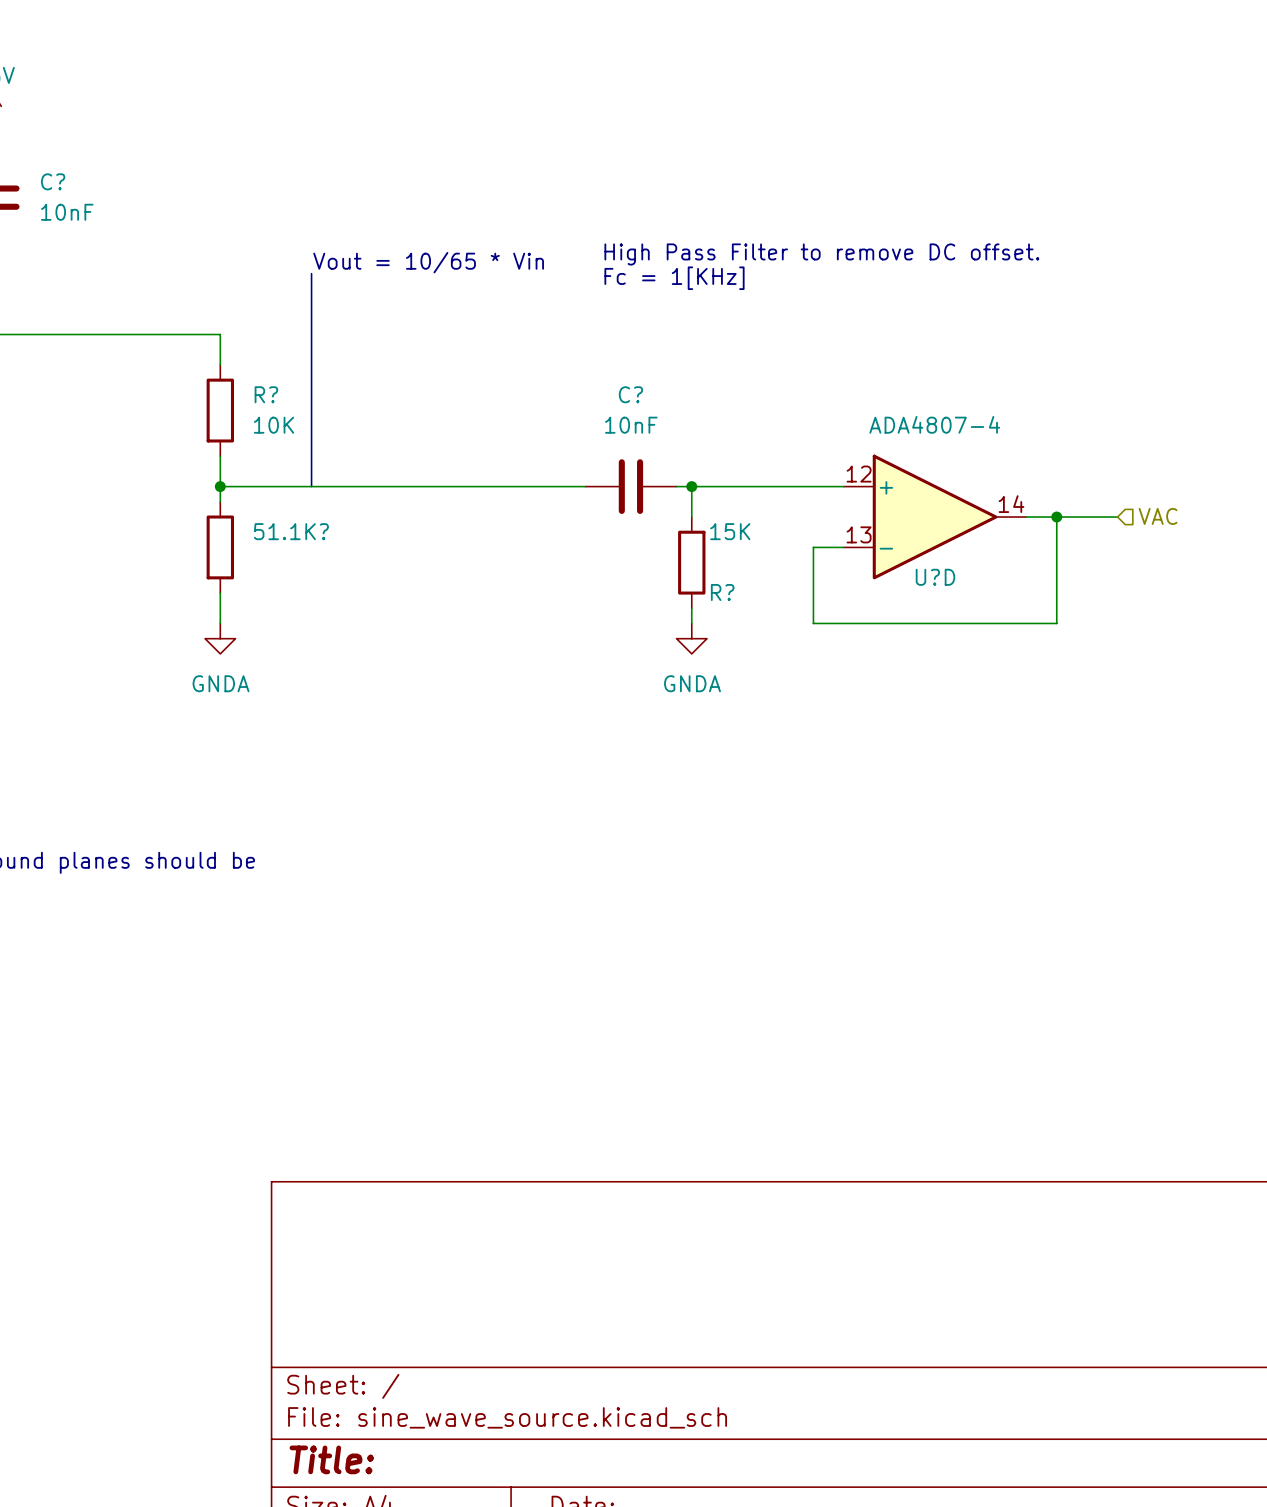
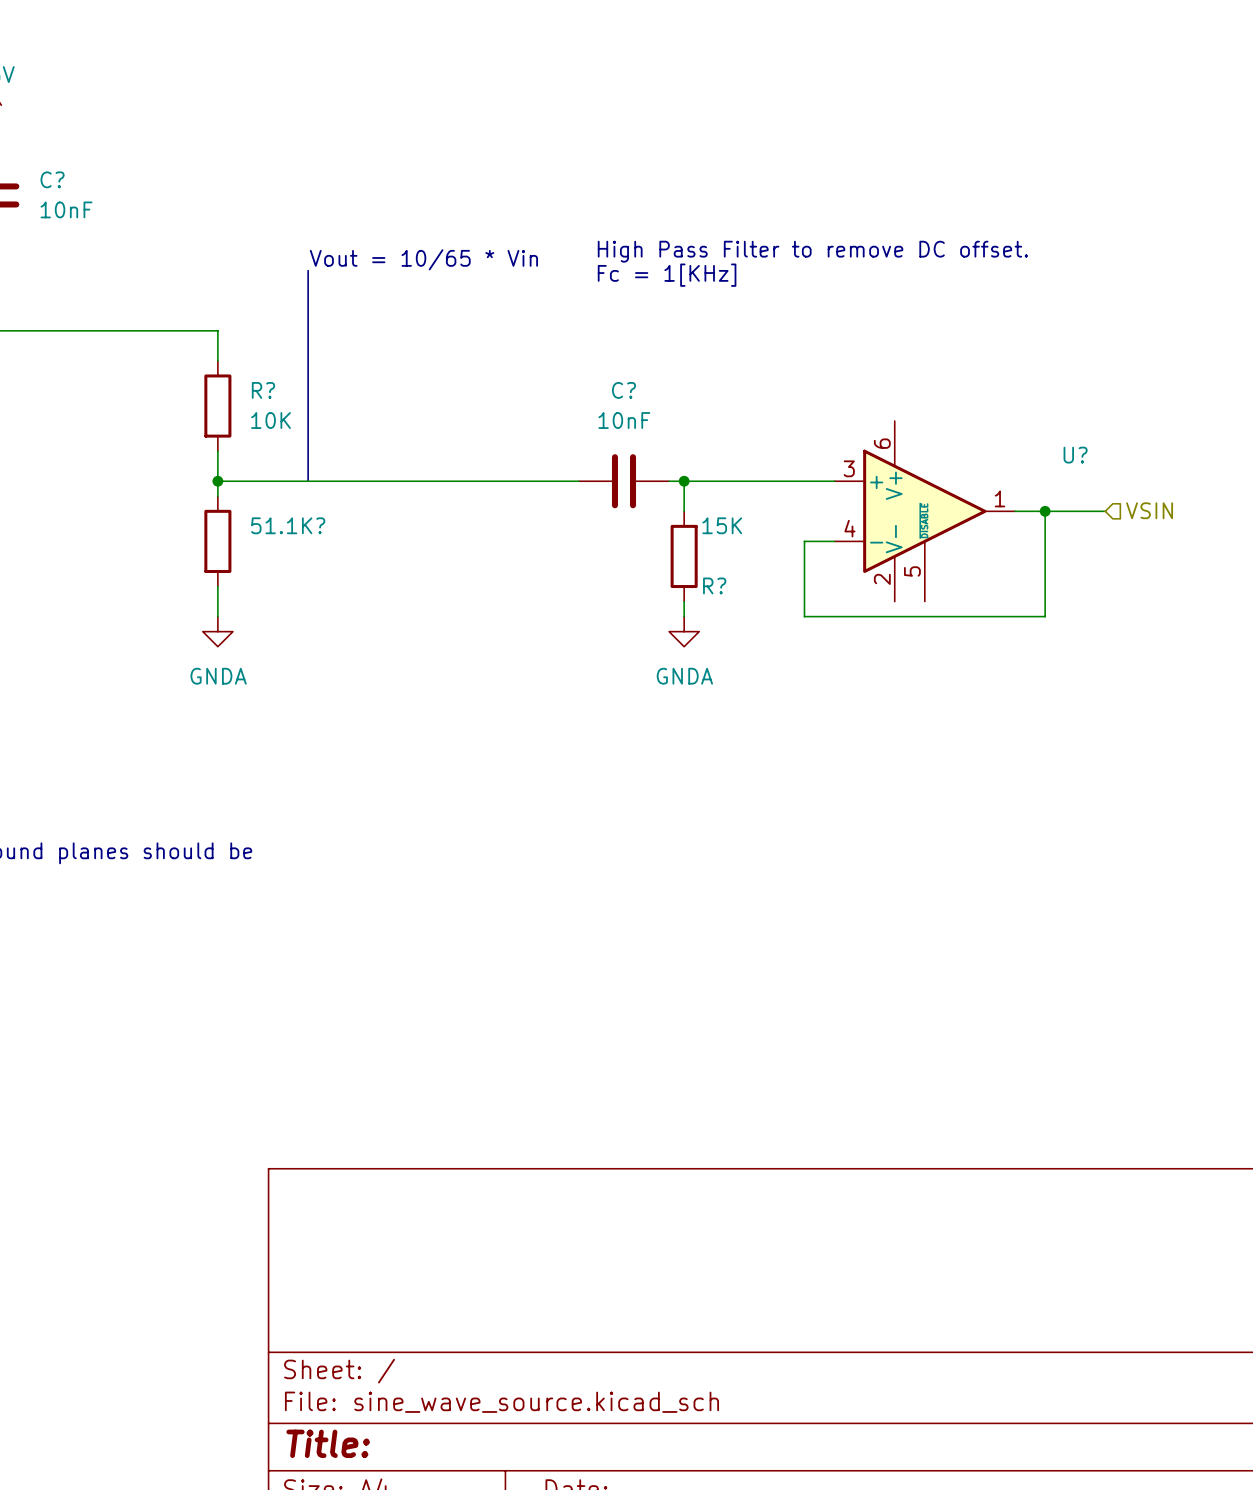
hierarchical label: VAC (1158, 516) -> VSIN (1149, 510)
U?D: ADA4807-4 (935, 517) -> none
U?: none -> (924, 511)

